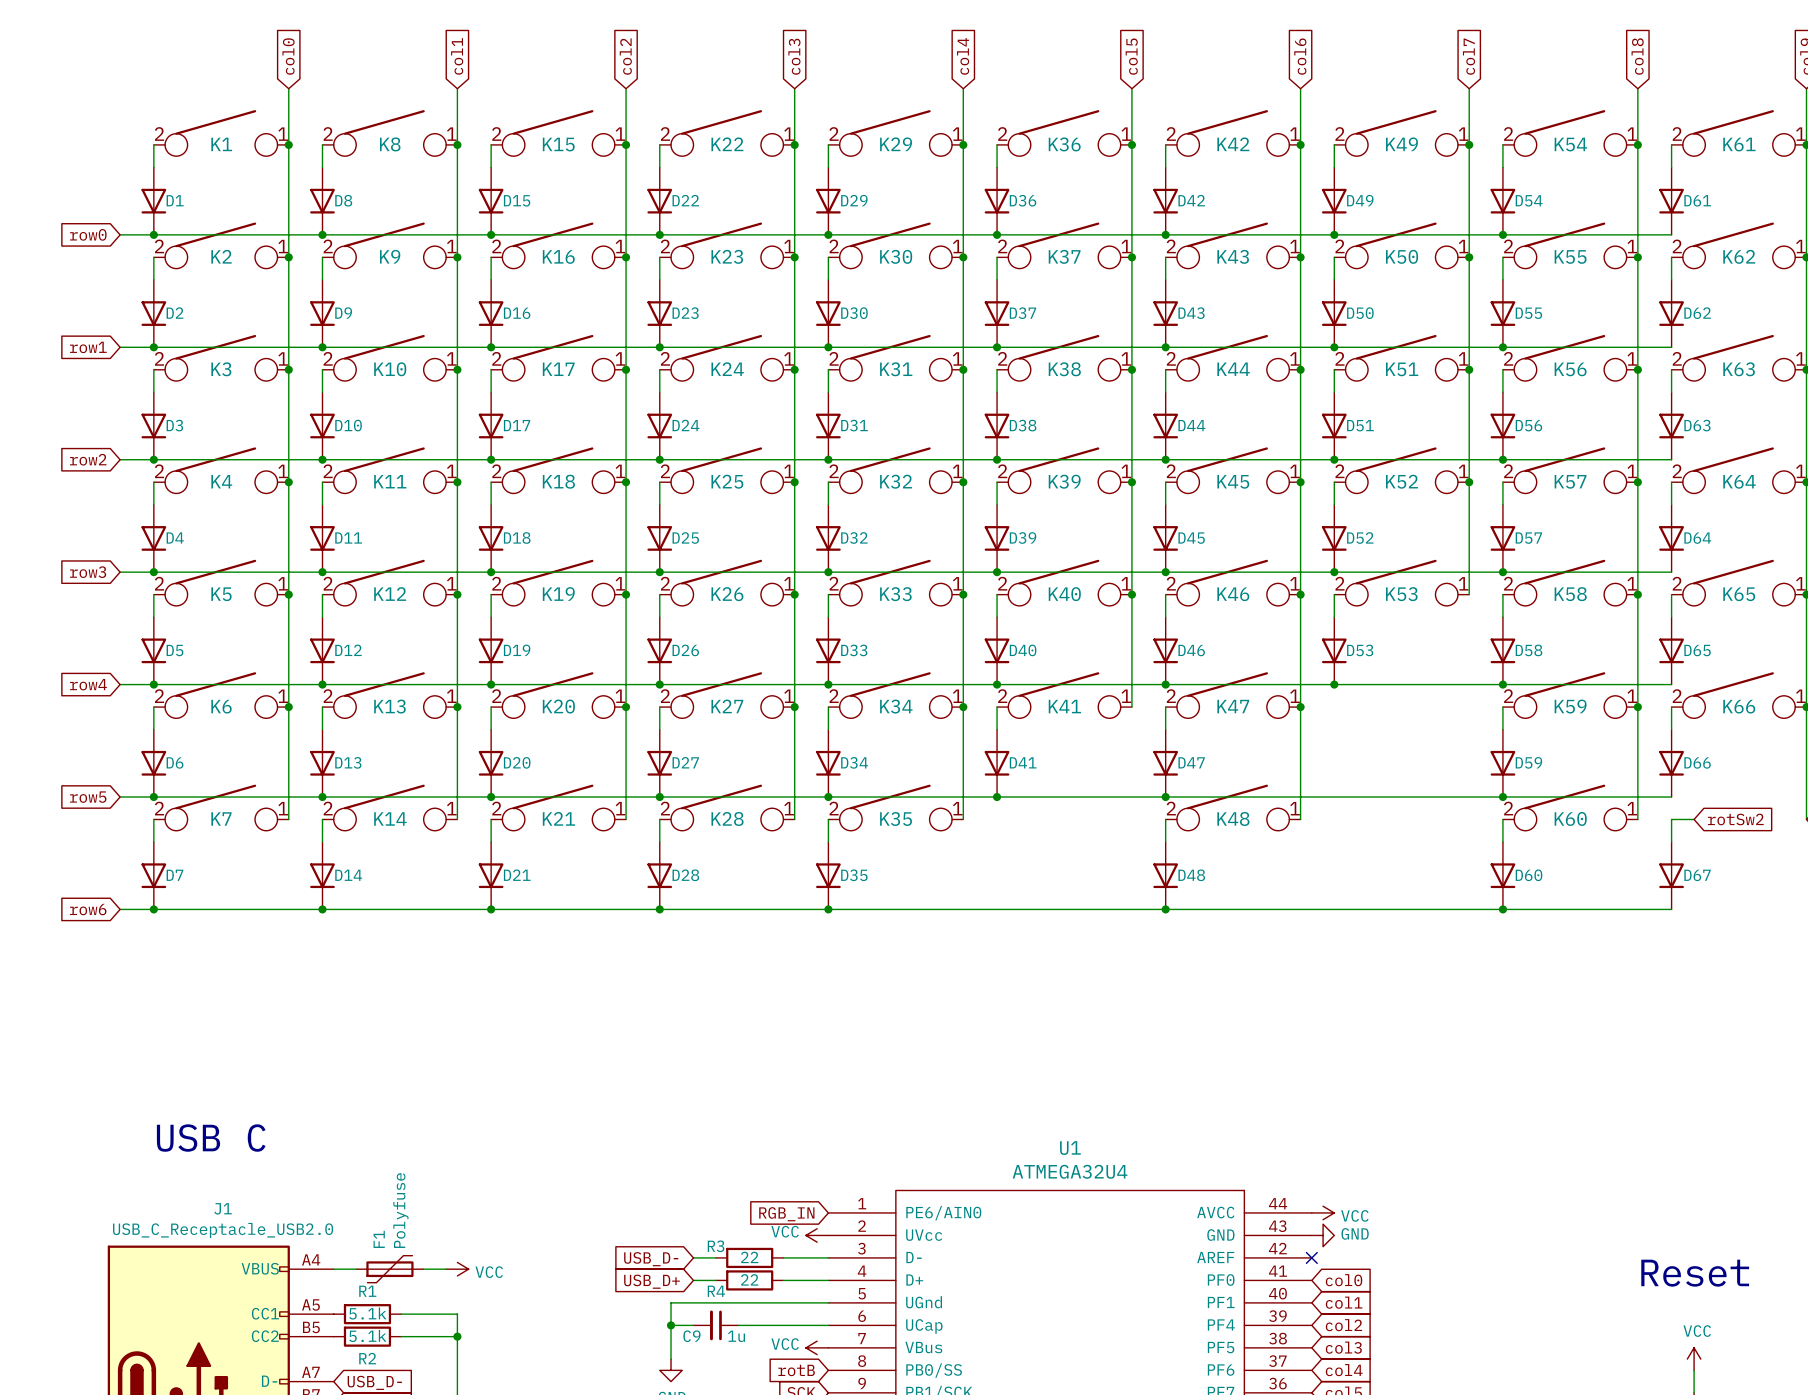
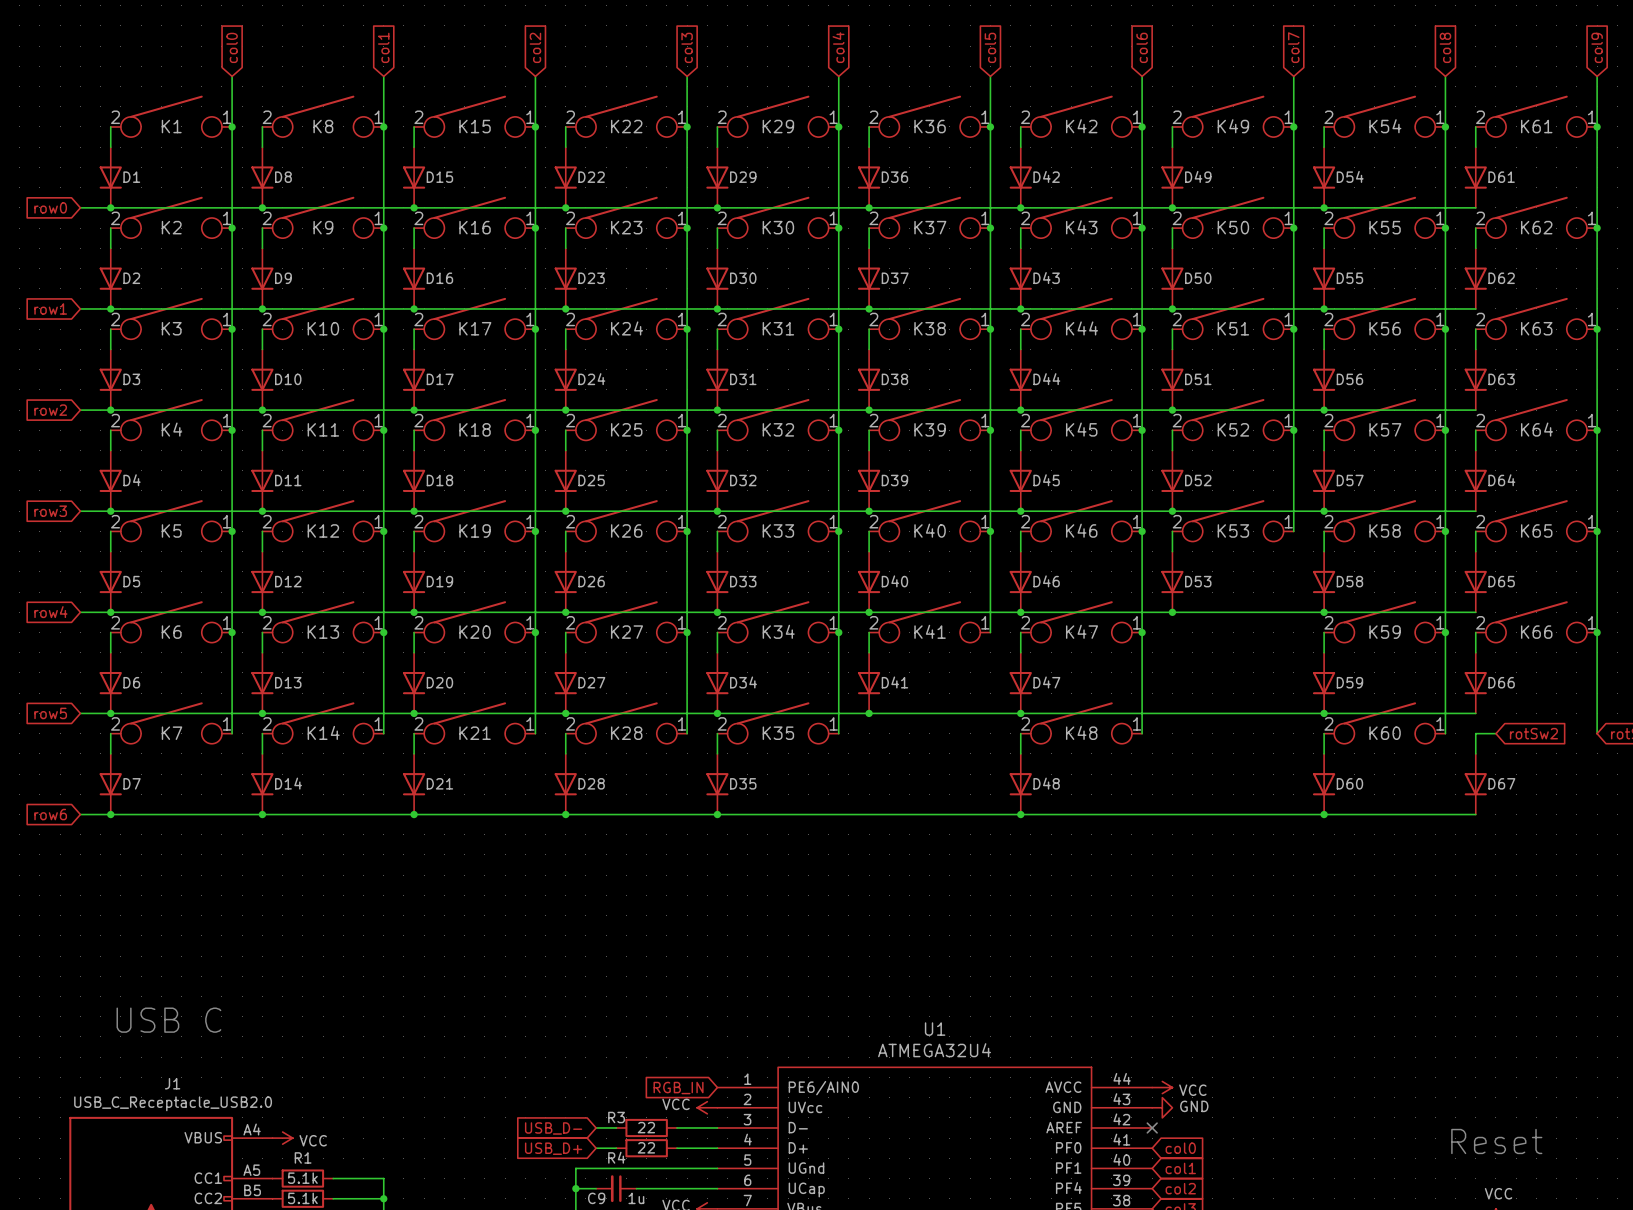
F1: Polyfuse (389, 1269) -> none
wire: (423, 1269) (446, 1269) -> none
power symbol position: VCC (457, 1269) -> VCC (282, 1138)

